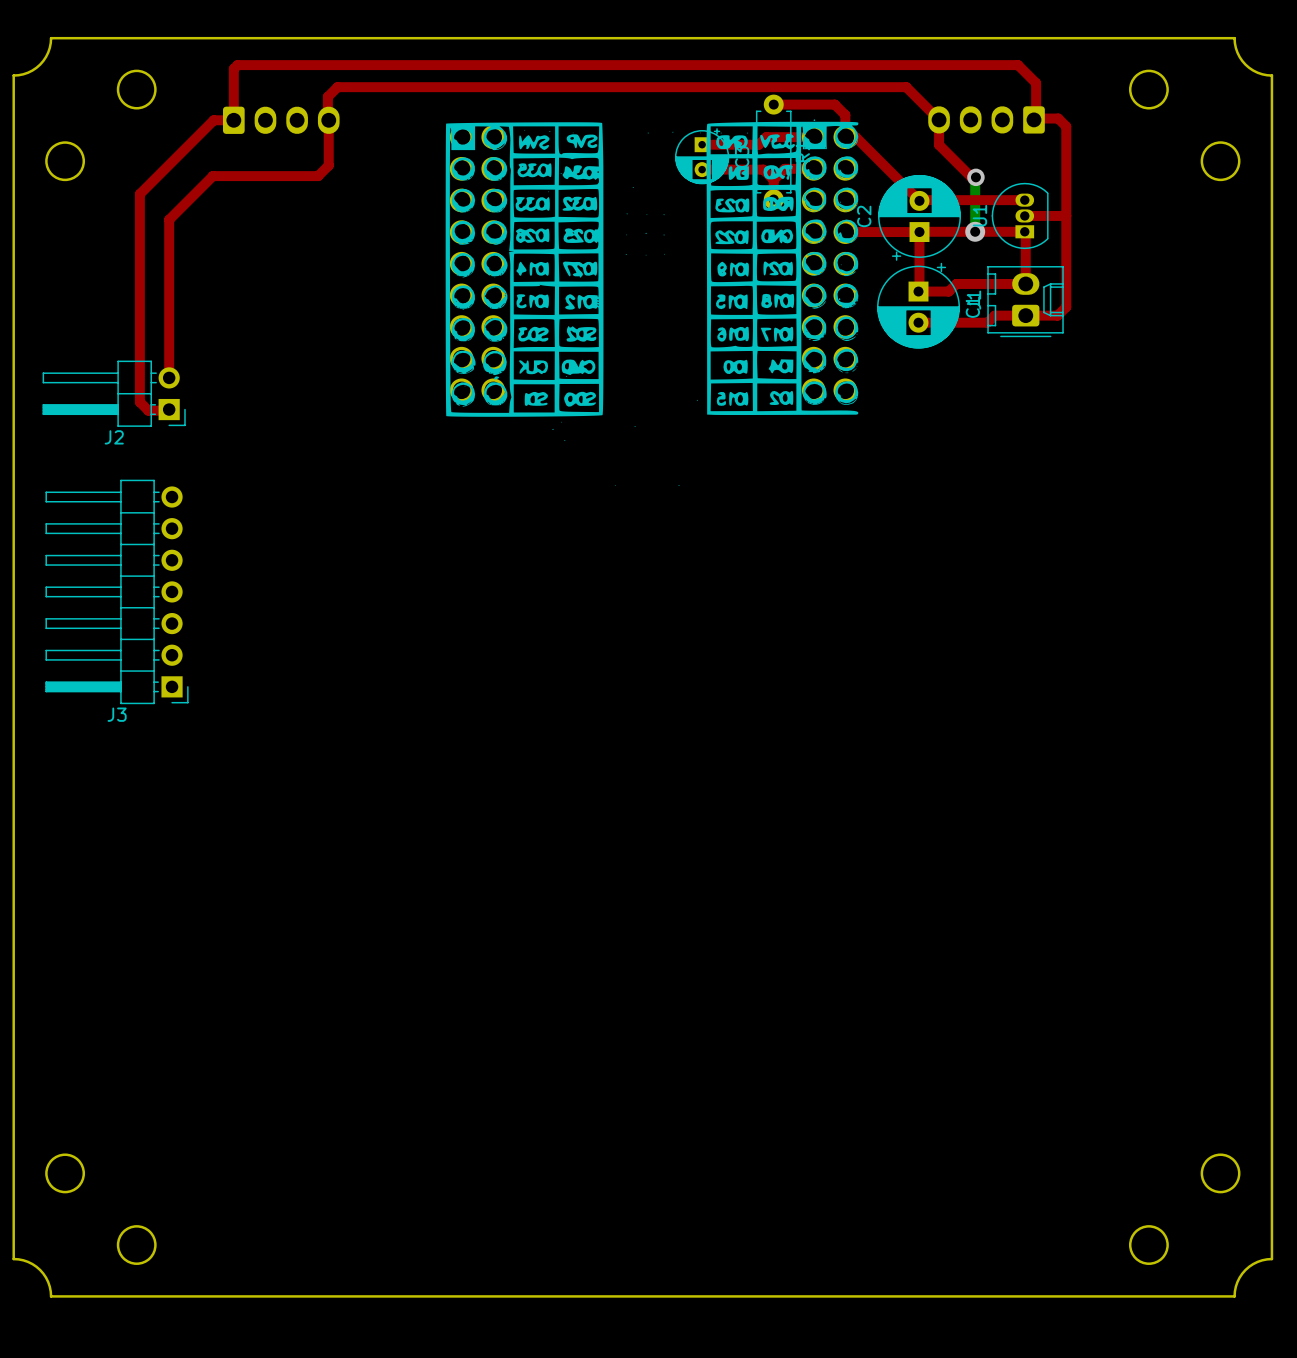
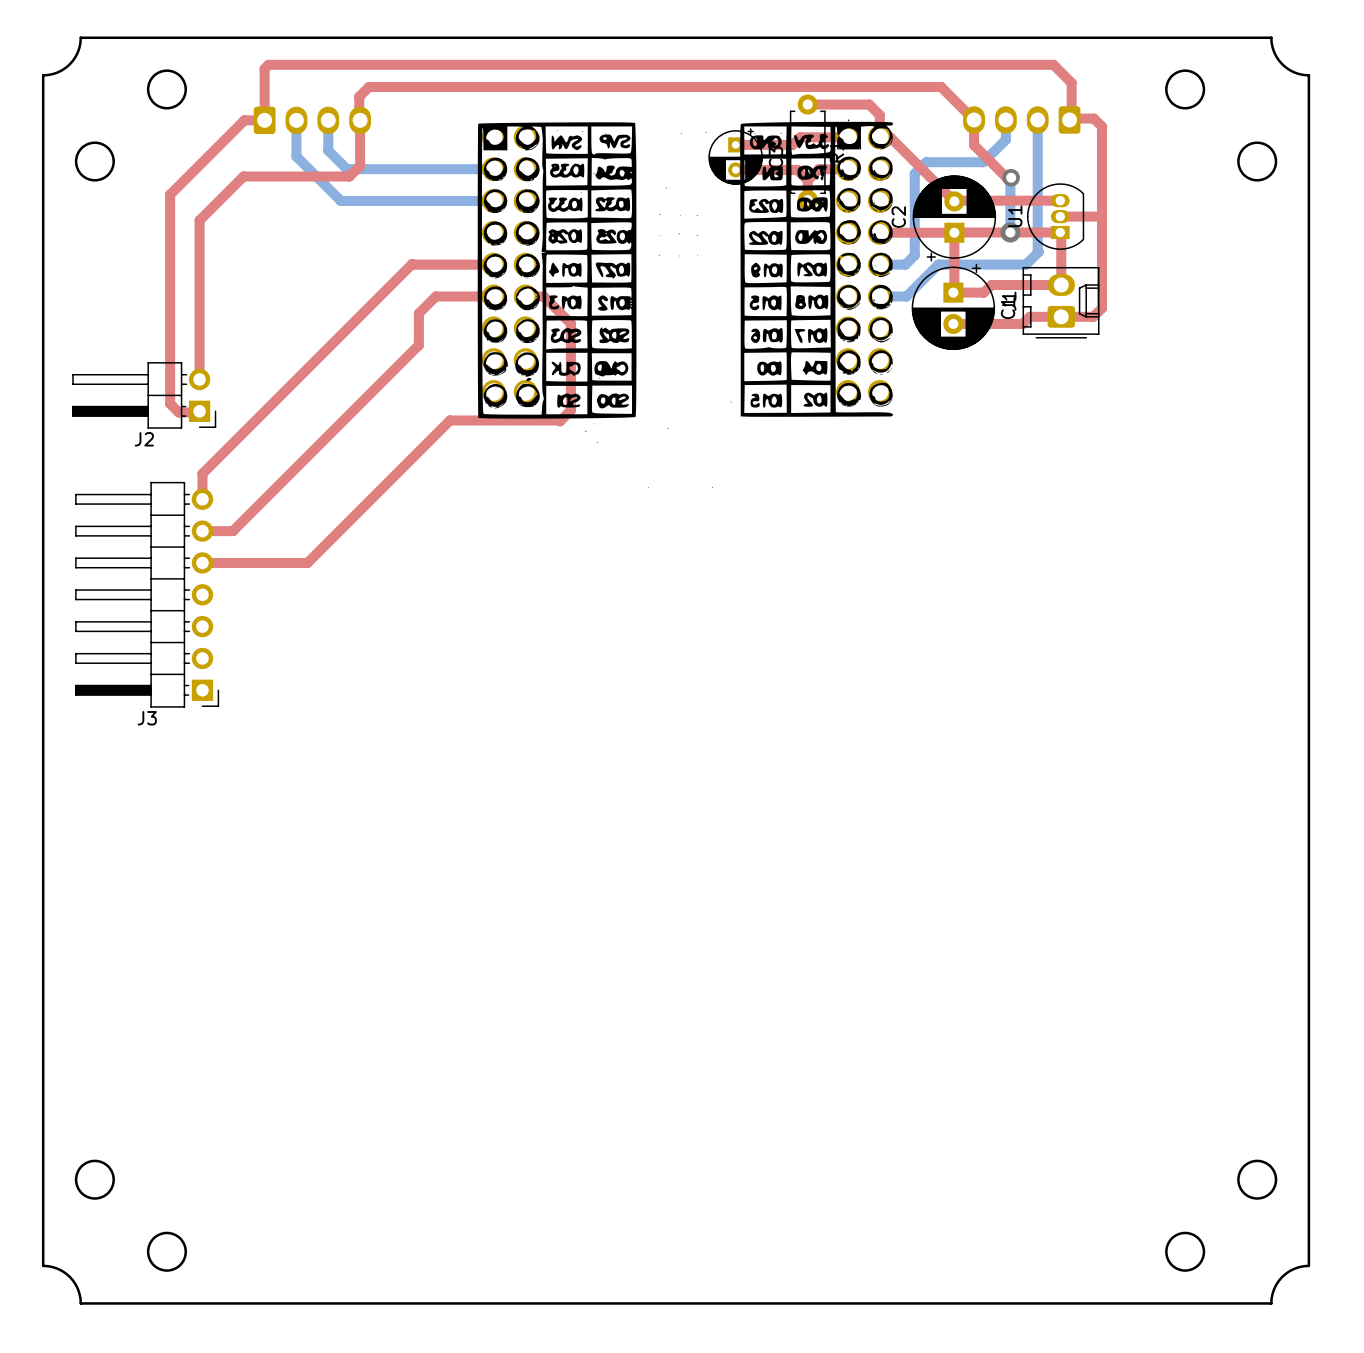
bottom track: none -> (1005, 119) (1005, 139) (983, 162) (926, 162) (914, 173) (914, 255) (905, 264) (879, 264)
bottom track: none -> (1037, 119) (1038, 251) (1026, 264) (938, 264) (906, 296) (879, 296)
bottom track: none -> (296, 120) (296, 156) (340, 200) (493, 200)
bottom track: none -> (328, 120) (328, 150) (346, 169) (493, 169)
top track: none -> (493, 264) (412, 264) (202, 473) (202, 499)
top track: none -> (493, 296) (435, 296) (418, 313) (418, 345) (232, 531) (202, 531)
top track: none -> (525, 296) (543, 296) (570, 323) (570, 410) (559, 421) (449, 420) (307, 562) (202, 562)

